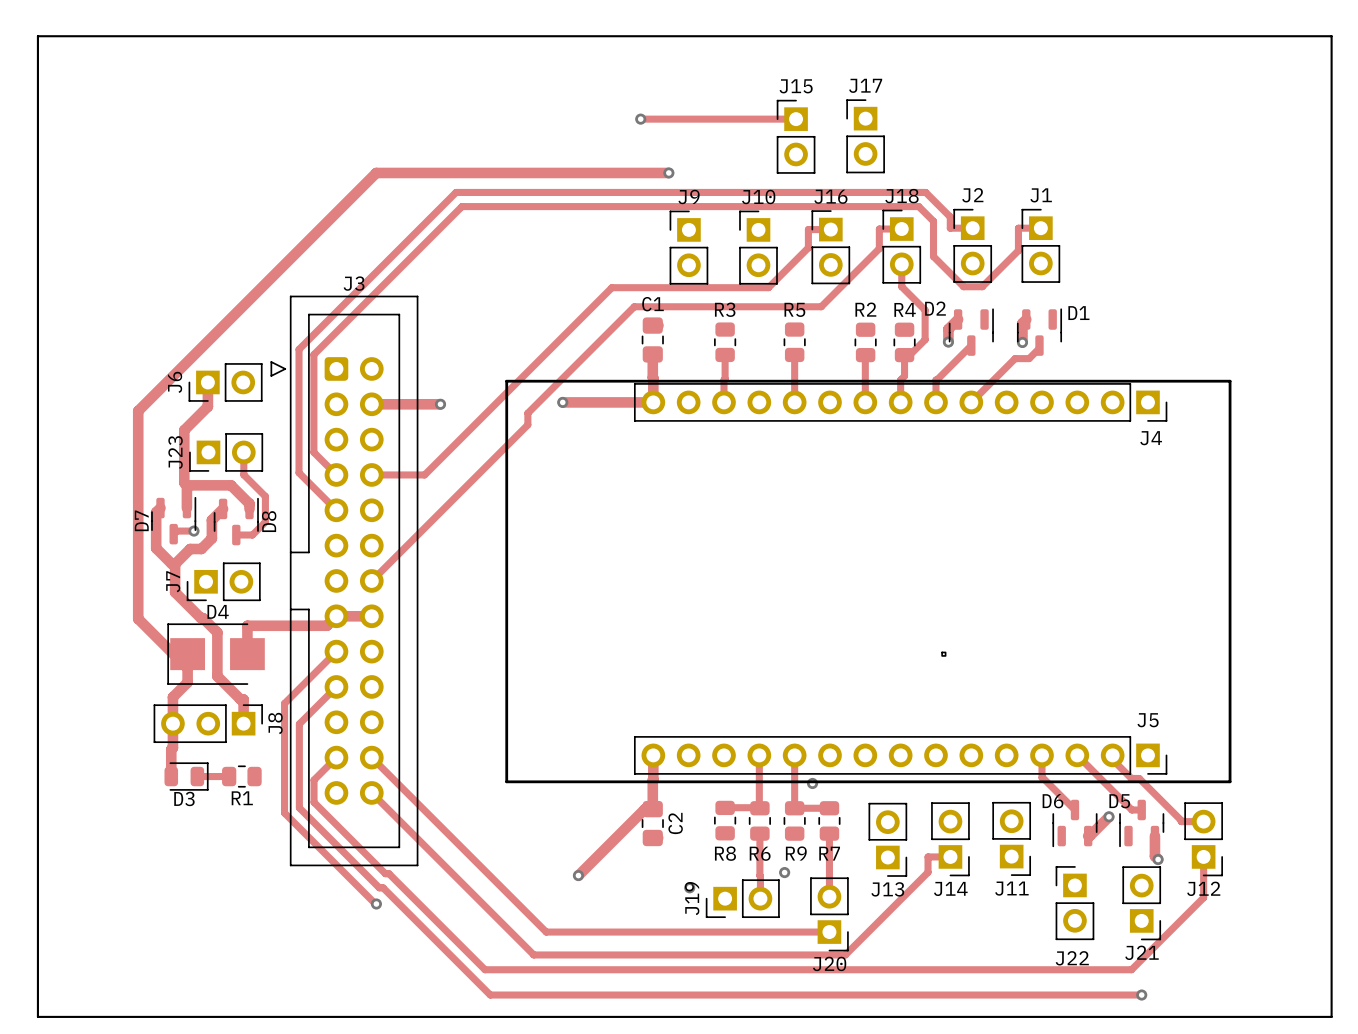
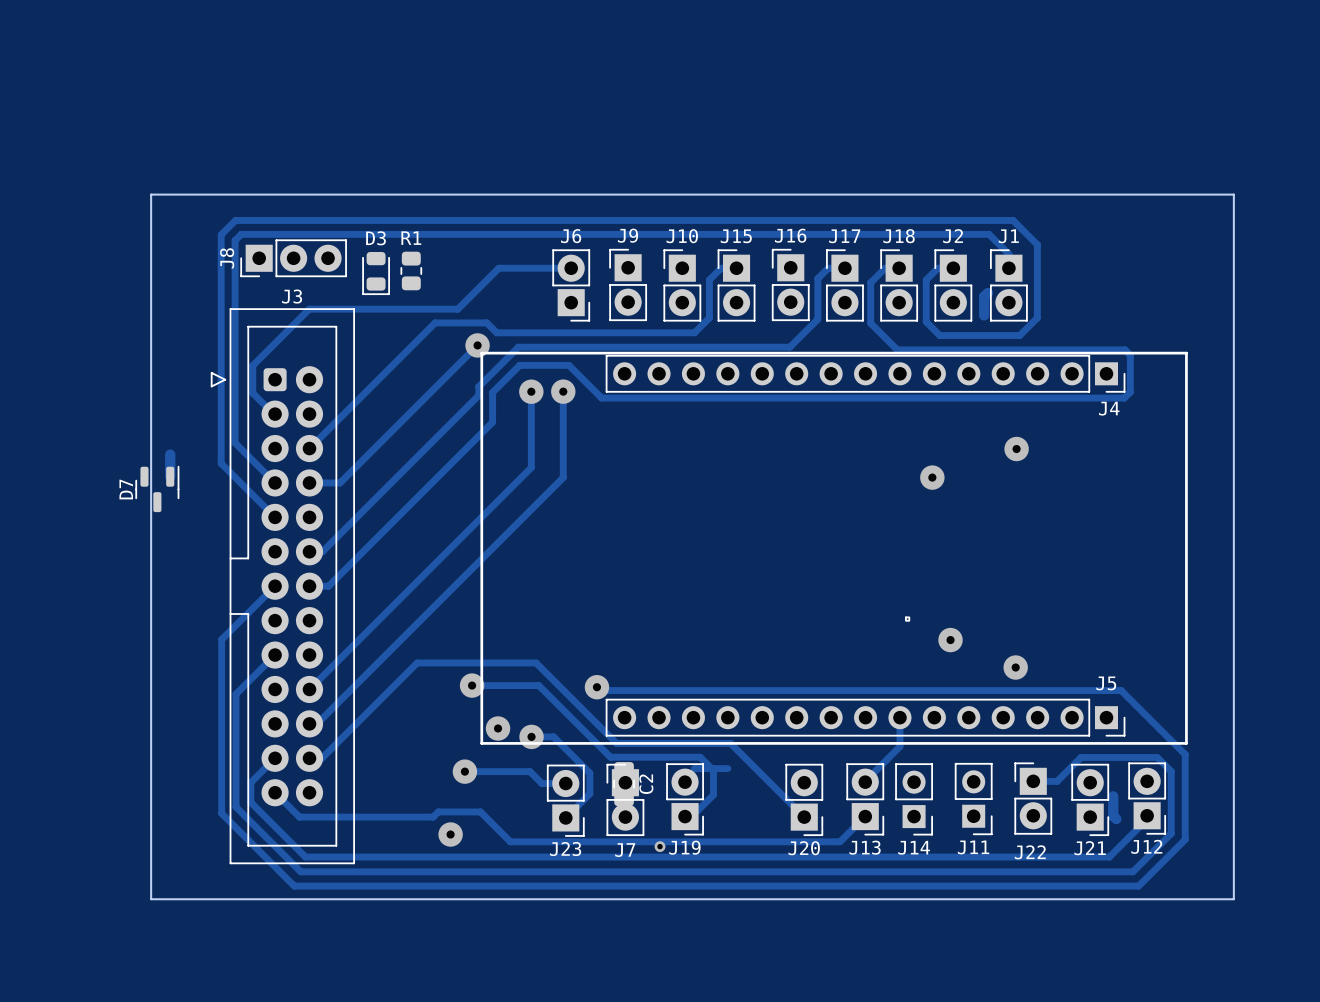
board edge: (37, 36) (37, 1016) (1331, 1016) (1331, 36) (37, 36) -> (151, 194) (151, 899) (1233, 899) (1233, 194) (151, 194)
J15 footprint: [776, 99, 816, 174] -> [717, 249, 756, 322]
J17 footprint: [846, 99, 885, 174] -> [826, 249, 864, 322]
track: (640, 119) (796, 119) -> none
via: (640, 119) -> none
track: (668, 172) (376, 172) (138, 411) (138, 618) (187, 668) -> none
via: (668, 172) -> none
J2 footprint: [953, 208, 993, 283] -> [934, 249, 973, 322]
J1 footprint: [1021, 208, 1061, 283] -> [990, 249, 1028, 322]
J18 footprint: [882, 209, 922, 284] -> [880, 249, 918, 322]
J9 footprint: [669, 210, 709, 285] -> [609, 248, 647, 322]
J10 footprint: [739, 210, 778, 285] -> [663, 249, 702, 322]
J16 footprint: [811, 210, 851, 285] -> [771, 248, 810, 322]
track: (972, 228) (950, 228) (950, 216) (925, 192) (456, 192) (299, 349) (299, 472) (336, 510) -> none
track: (1040, 228) (1018, 228) (1018, 250) (982, 286) (963, 286) (933, 256) (933, 221) (918, 206) (461, 206) (313, 354) (313, 452) (336, 474) -> none
track: (830, 229) (808, 229) (808, 247) (768, 287) (611, 287) (424, 474) (371, 474) -> none
track: (901, 229) (879, 229) (879, 248) (821, 306) (634, 306) (527, 413) (527, 424) (371, 580) -> none
track: (901, 264) (901, 286) (925, 310) (925, 339) (909, 355) (904, 355) (904, 376) (900, 379) (900, 402) -> none
track: none -> (571, 268) (498, 268) (457, 309) (309, 309) (252, 365) (252, 393) (275, 414)
track: none -> (736, 268) (721, 268) (709, 279) (709, 317) (694, 332) (496, 332) (486, 322) (435, 322) (309, 448)
track: none -> (844, 268) (828, 268) (817, 278) (817, 319) (789, 347) (518, 347) (478, 386) (478, 395) (322, 551) (309, 551)
track: none -> (899, 268) (885, 268) (870, 282) (870, 323) (897, 349) (1125, 349) (1130, 355) (1130, 392) (1124, 398) (601, 398) (568, 365) (519, 365) (492, 392) (492, 422) (328, 586) (309, 586)
track: none -> (953, 268) (937, 268) (926, 279) (926, 321) (939, 335) (1019, 335) (1037, 317) (1037, 244) (1013, 220) (235, 220) (221, 234) (221, 463) (275, 517)
track: none -> (1008, 268) (1008, 254) (989, 234) (241, 234) (235, 240) (235, 442) (275, 482)
J3 footprint: [270, 295, 419, 867] -> [210, 308, 355, 865]
track: (958, 319) (948, 329) (948, 342) -> none
D2: (971, 332) -> none
D1: (1039, 332) -> none
C1: (652, 339) -> none
R3: (725, 342) -> none
R5: (794, 342) -> none
R2: (865, 342) -> none
R4: (904, 342) -> none
via: (948, 342) -> none
via: (1022, 342) -> none
track: (971, 345) (935, 379) (935, 402) -> none
track: (1039, 345) (1039, 348) (1029, 358) (1015, 358) (971, 402) -> none
track: (652, 354) (653, 402) (562, 402) -> none
track: (725, 354) (724, 402) -> none
track: (794, 354) (794, 402) -> none
track: (865, 355) (865, 402) -> none
J6 footprint: [188, 363, 263, 402] -> [552, 249, 591, 322]
track: none -> (477, 345) (340, 482) (309, 482)
via: none -> (477, 345)
J6 name position: J6 (175, 382) -> J6 (571, 236)
track: (207, 382) (207, 406) (184, 430) (184, 482) (186, 485) (231, 485) (249, 503) (249, 508) -> none
via: (562, 402) -> none
track: (371, 404) (440, 404) -> none
via: (440, 404) -> none
track: none -> (531, 391) (531, 467) (309, 689)
via: none -> (531, 391)
track: none -> (563, 391) (563, 477) (316, 723) (309, 723)
via: none -> (563, 391)
J23 footprint: [189, 433, 264, 472] -> [546, 764, 585, 837]
J23 name position: J23 (175, 452) -> J23 (565, 849)
track: (243, 452) (243, 474) (265, 496) (265, 522) (252, 535) (236, 535) -> none
via: none -> (1016, 449)
track: (160, 508) (156, 512) (156, 548) (171, 564) (175, 564) -> none
track: (223, 508) (211, 520) (211, 538) (201, 549) (190, 549) (175, 564) -> none
via: none -> (932, 477)
D8: (236, 521) -> none
track: (193, 531) (176, 531) (173, 534) -> none
via: (193, 531) -> none
J7 footprint: [186, 562, 261, 602] -> [606, 763, 645, 836]
track: (175, 564) (175, 592) (217, 632) (217, 676) (240, 699) (243, 699) (243, 723) -> none
J7 name position: J7 (173, 581) -> J7 (625, 850)
track: (371, 616) (336, 616) (326, 625) (247, 625) (247, 654) -> none
track: none -> (275, 586) (221, 639) (221, 813) (294, 886) (1138, 886) (1185, 839) (1185, 754) (1121, 690) (600, 690) (596, 687)
track: (336, 651) (284, 703) (284, 813) (376, 904) -> none
track: (187, 654) (187, 682) (172, 697) (171, 776) -> none
D4: (216, 654) -> none
via: none -> (950, 640)
track: (336, 686) (299, 724) (299, 807) (379, 887) (383, 887) (490, 995) (1141, 995) -> none
track: none -> (275, 655) (235, 694) (235, 807) (300, 871) (1132, 871) (1171, 833) (1171, 771) (1157, 757) (1081, 757) (1057, 781) (1033, 781)
via: none -> (1015, 667)
J8 footprint: [153, 704, 263, 744] -> [240, 239, 347, 278]
track: none -> (472, 685) (538, 685) (610, 757) (700, 757) (713, 770) (713, 794) (691, 816) (685, 816)
via: none -> (472, 685)
J8 name position: J8 (275, 723) -> J8 (227, 258)
via: none -> (596, 687)
track: (653, 755) (652, 809) (644, 809) (578, 875) -> none
track: (759, 755) (759, 808) -> none
track: (794, 755) (794, 808) (829, 808) -> none
track: none -> (899, 717) (899, 746) (865, 782)
track: (1041, 755) (1041, 777) (1074, 809) -> none
track: (1077, 755) (1131, 809) (1141, 809) -> none
track: (1112, 755) (1112, 759) (1131, 778) (1139, 778) (1181, 821) (1203, 821) -> none
track: (336, 757) (314, 780) (314, 802) (485, 969) (1131, 969) (1203, 897) (1203, 856) -> none
track: (371, 757) (546, 932) (829, 932) -> none
via: none -> (498, 728)
track: none -> (531, 736) (553, 736) (589, 773) (589, 793) (565, 817)
via: none -> (531, 736)
D3 rotation: 0° (186, 776) -> 90° clockwise (376, 273)
D3 position: (186, 776) -> (376, 273)
track: (197, 776) (229, 776) -> none
R1 rotation: 0° (241, 776) -> 90° clockwise (411, 270)
R1 position: (241, 776) -> (411, 270)
via: (812, 783) -> none
track: (371, 792) (533, 954) (845, 954) (928, 872) (928, 856) (950, 856) -> none
track: none -> (275, 758) (250, 782) (250, 802) (305, 857) (1109, 857) (1147, 819) (1147, 815)
track: none -> (309, 758) (321, 758) (417, 662) (536, 662) (616, 743) (730, 743) (804, 817)
D3 name position: D3 (184, 798) -> D3 (376, 238)
R1 name position: R1 (242, 798) -> R1 (411, 238)
J13 footprint: [868, 802, 908, 877] -> [846, 763, 885, 836]
J12 footprint: [1184, 802, 1223, 877] -> [1128, 762, 1166, 835]
track: none -> (464, 771) (530, 771) (541, 783) (565, 783)
via: none -> (464, 771)
track: (1109, 816) (1088, 836) -> none
via: (1109, 816) -> none
R8: (725, 820) -> none
R6: (759, 820) -> none
R9: (794, 820) -> none
R7: (829, 820) -> none
D6: (1074, 823) -> none
D5: (1141, 823) -> none
track: none -> (275, 792) (299, 817) (433, 817) (438, 811) (480, 811) (510, 841) (840, 841) (865, 816)
track: (759, 833) (760, 898) -> none
track: (829, 833) (829, 896) -> none
via: (1158, 859) -> none
J22 footprint: [1055, 866, 1095, 941] -> [1014, 762, 1053, 835]
J21 footprint: [1122, 866, 1162, 941] -> [1071, 763, 1110, 836]
via: (784, 872) -> none
via: none -> (450, 834)
via: (578, 875) -> none
J20 footprint: [810, 877, 849, 952] -> [785, 763, 824, 836]
J19 footprint: [705, 879, 780, 919] -> [666, 763, 704, 836]
J19 name position: J19 (692, 898) -> J19 (684, 847)
via: (376, 904) -> none
via: (1141, 995) -> none

